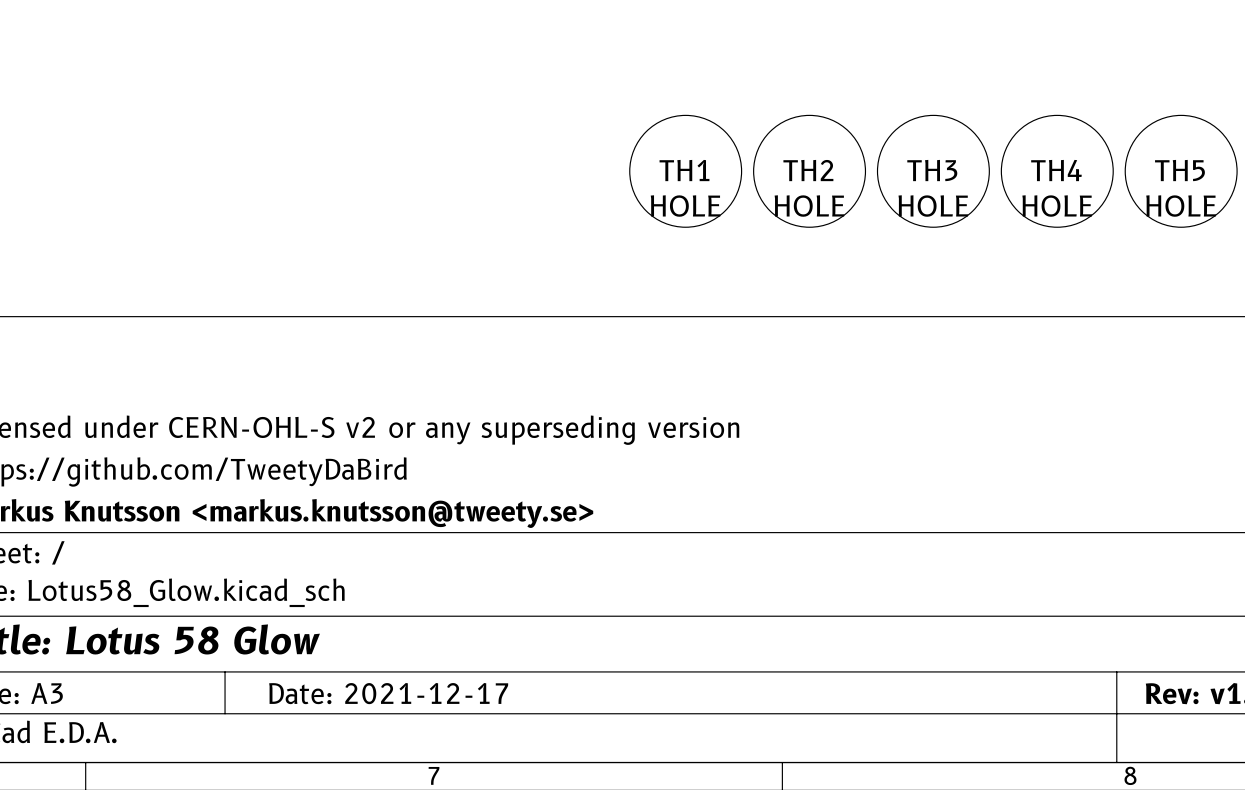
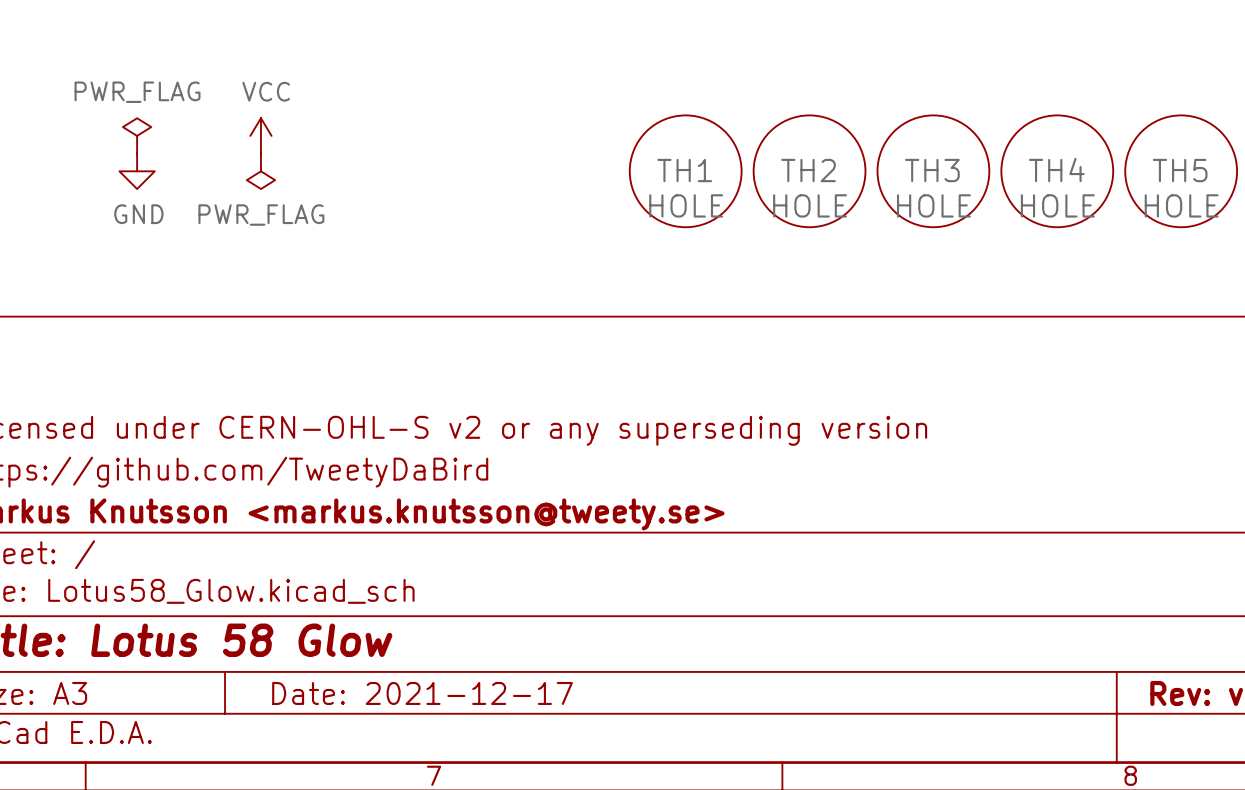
power symbol: none -> PWR_FLAG (137, 135)
power symbol: none -> VCC (260, 135)
power symbol: none -> GND (137, 171)
power symbol: none -> PWR_FLAG (260, 171)

